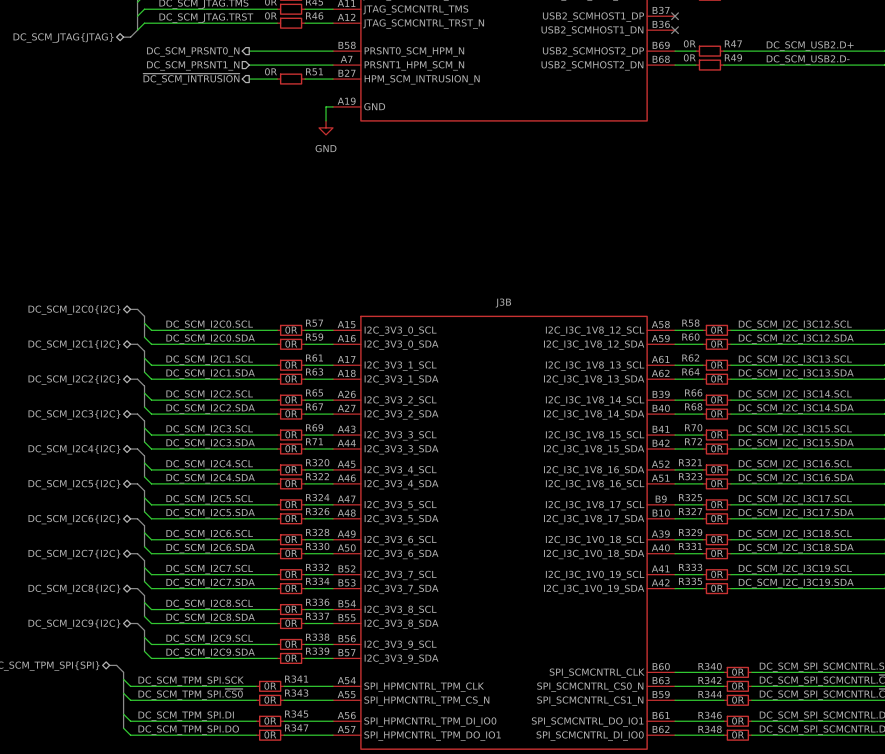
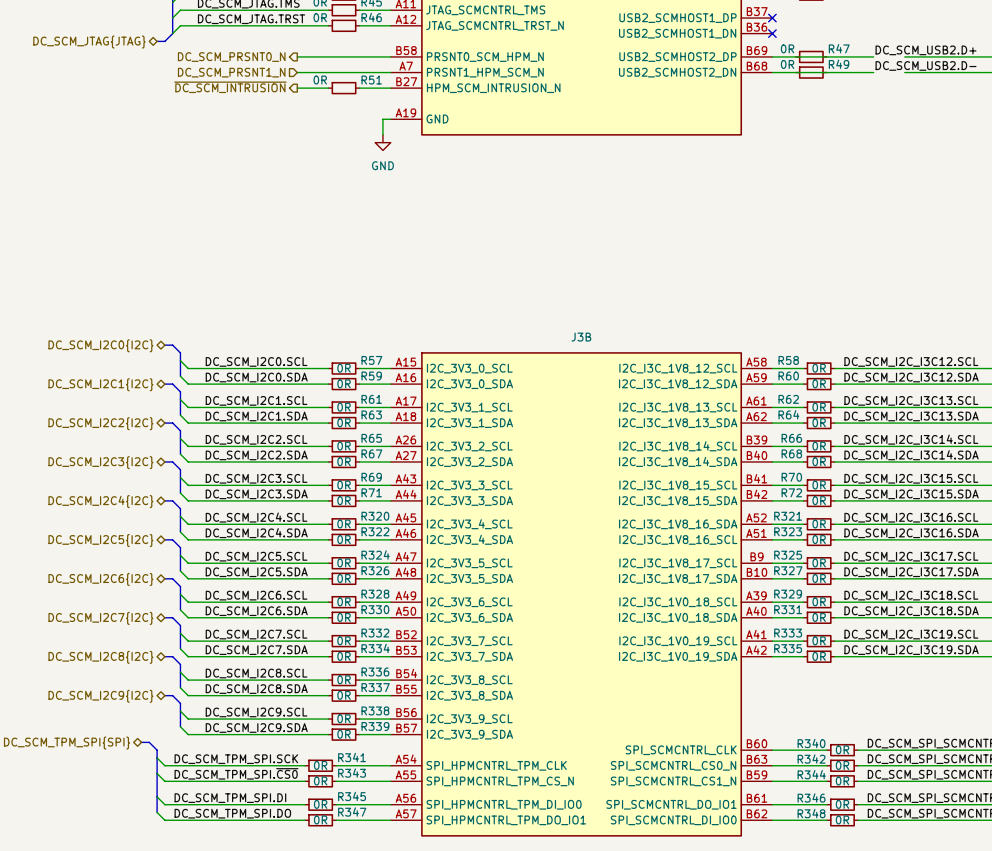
wire: (765, 51) (793, 51) -> (795, 56) (826, 56)
wire: (765, 65) (793, 65) -> (795, 72) (826, 72)

